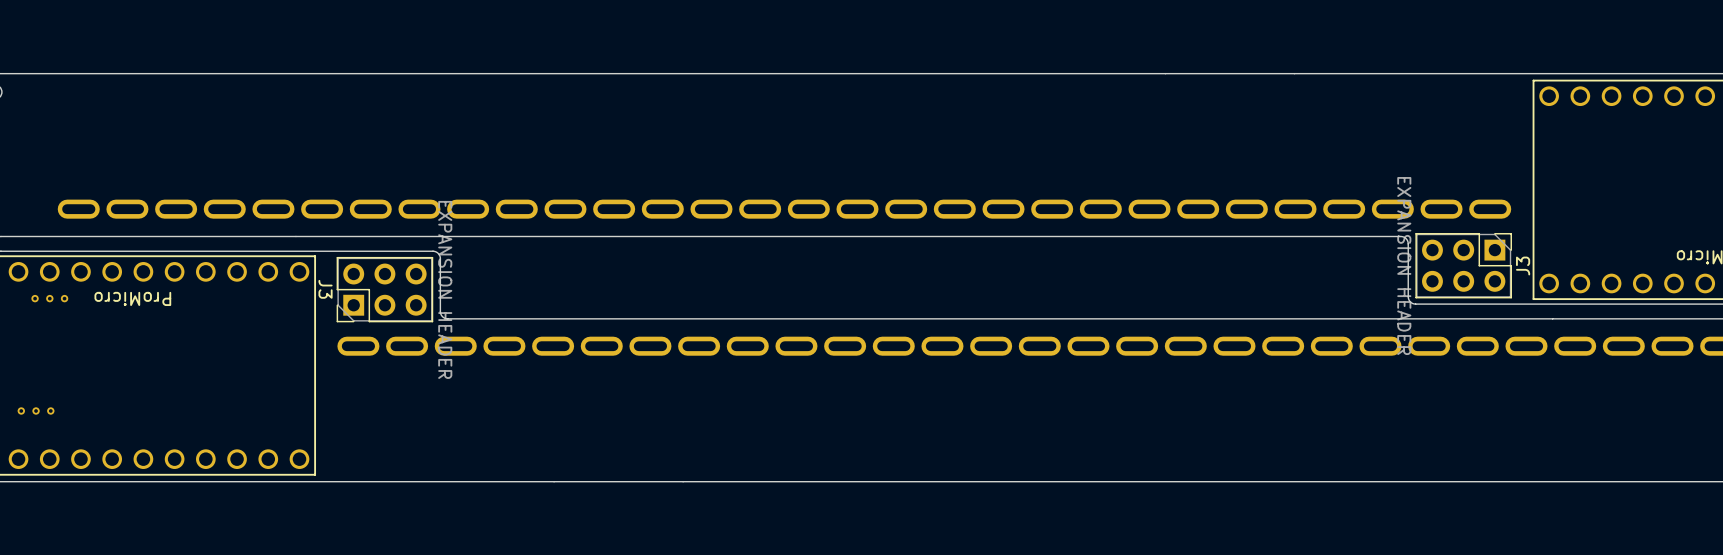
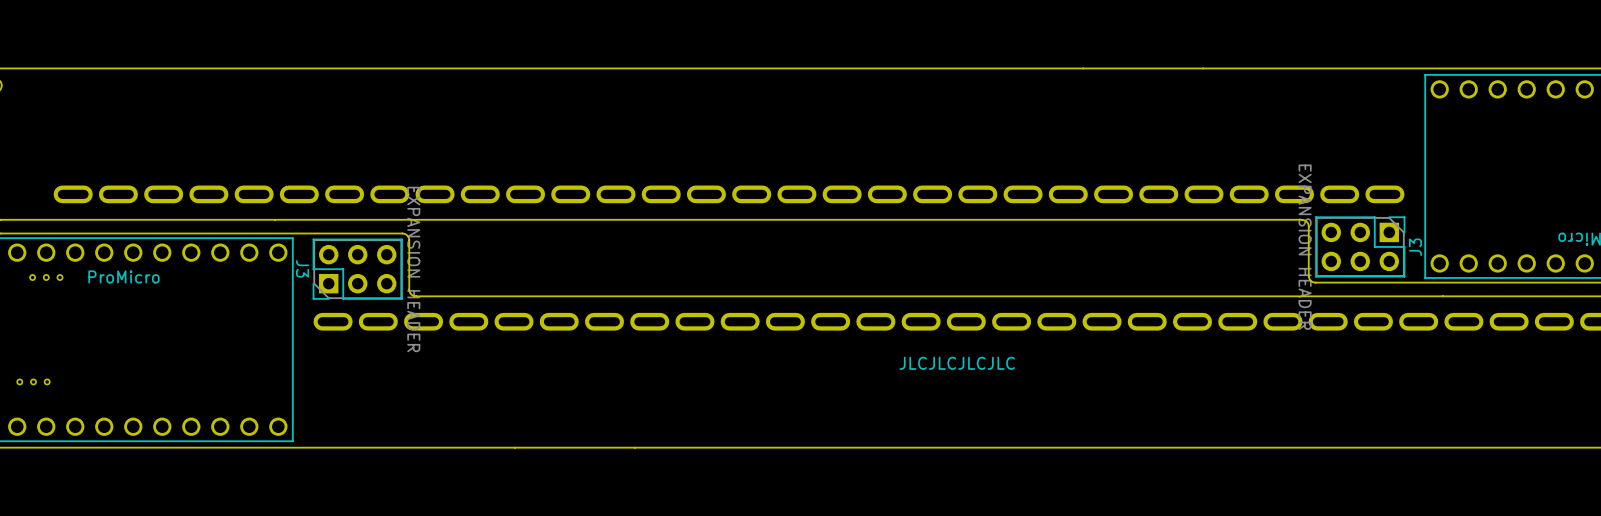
part value rotation: 0° (132, 298) -> 180° (124, 276)
text: none -> JLCJLCJLCJLC (957, 363)

